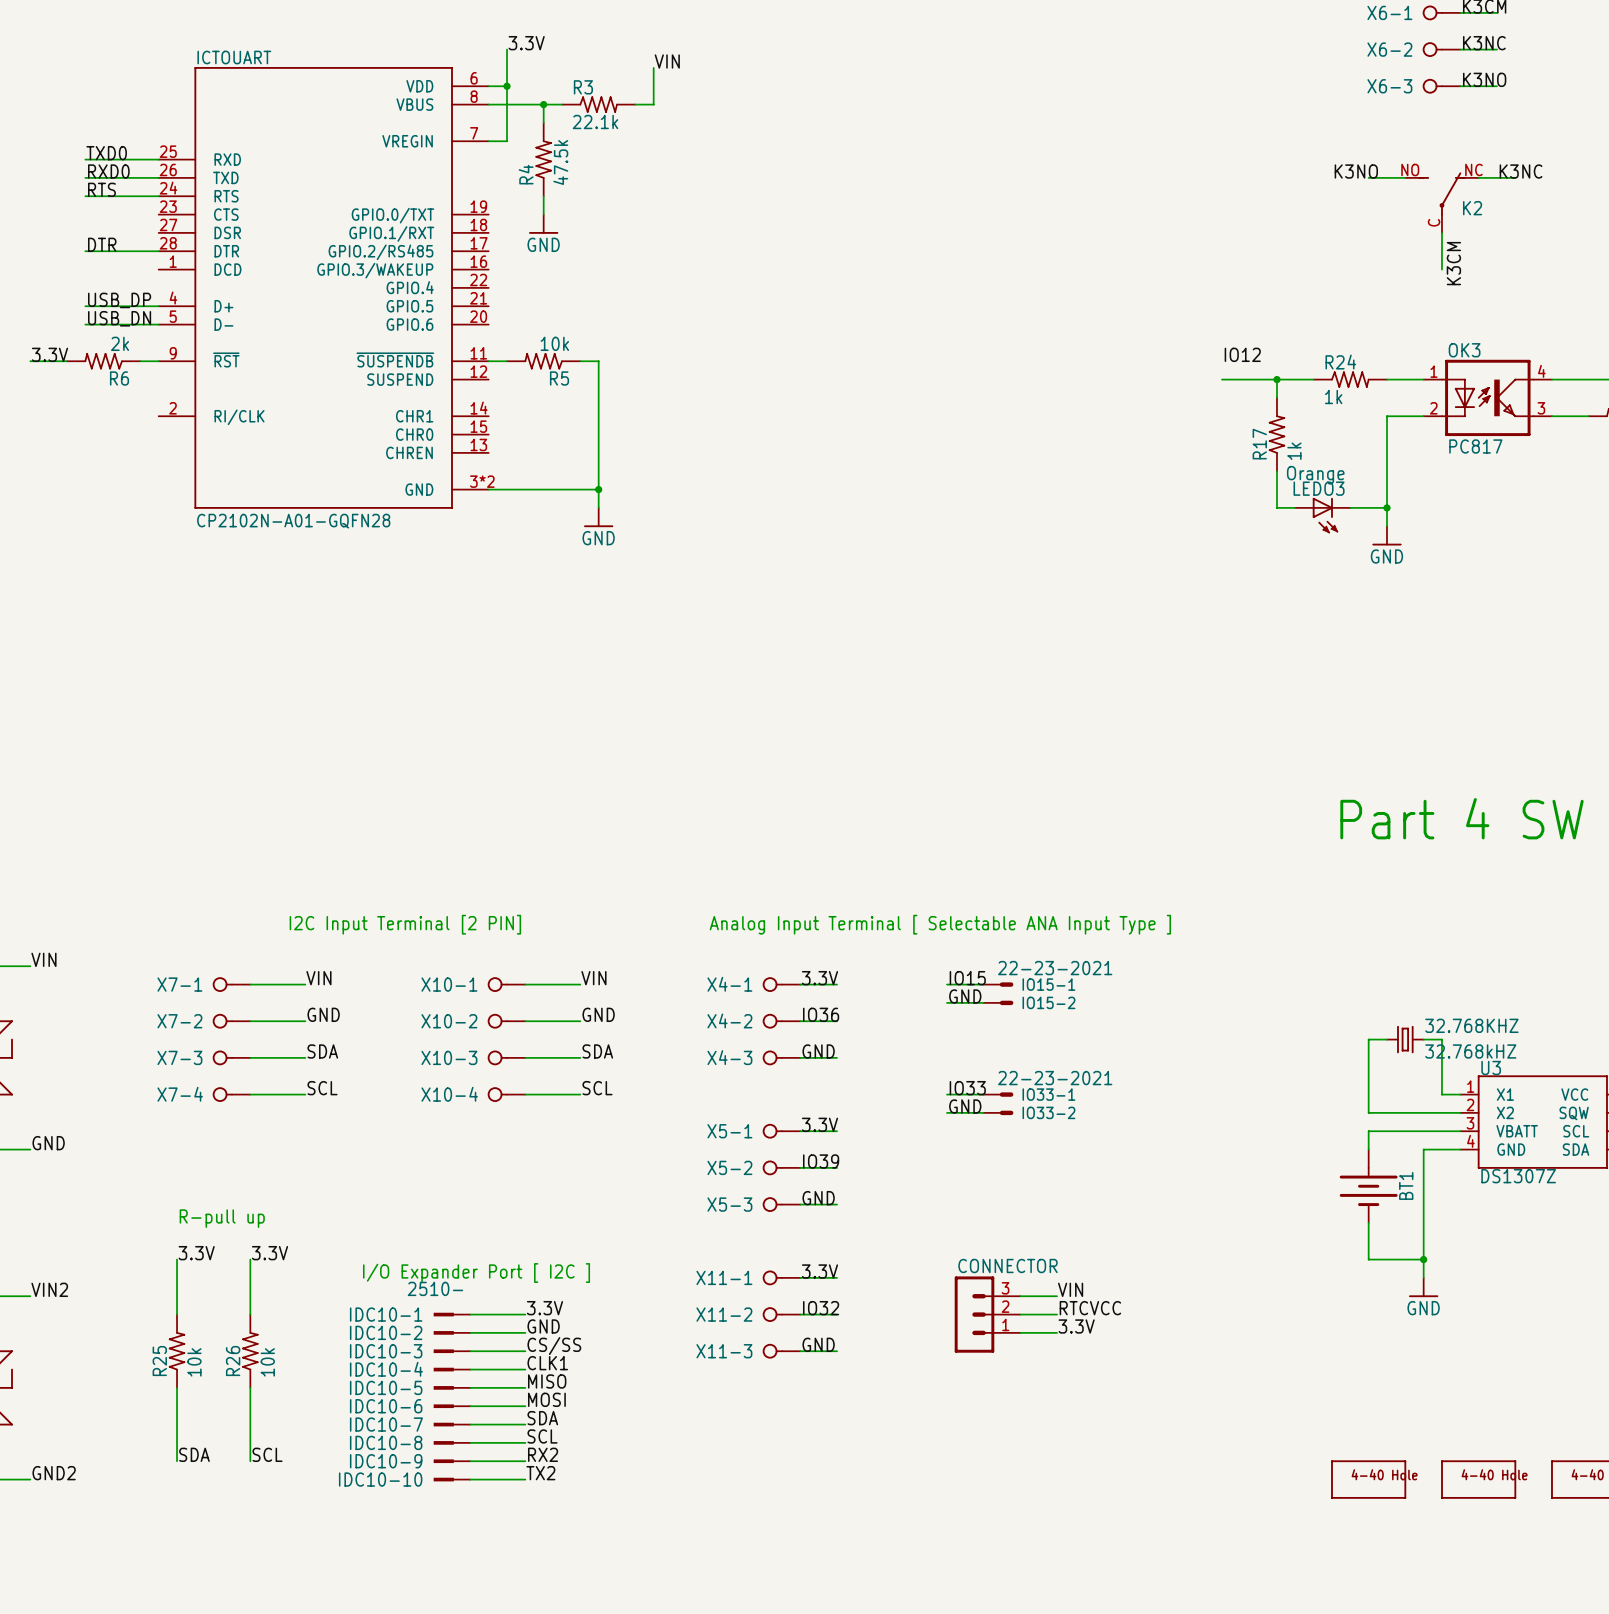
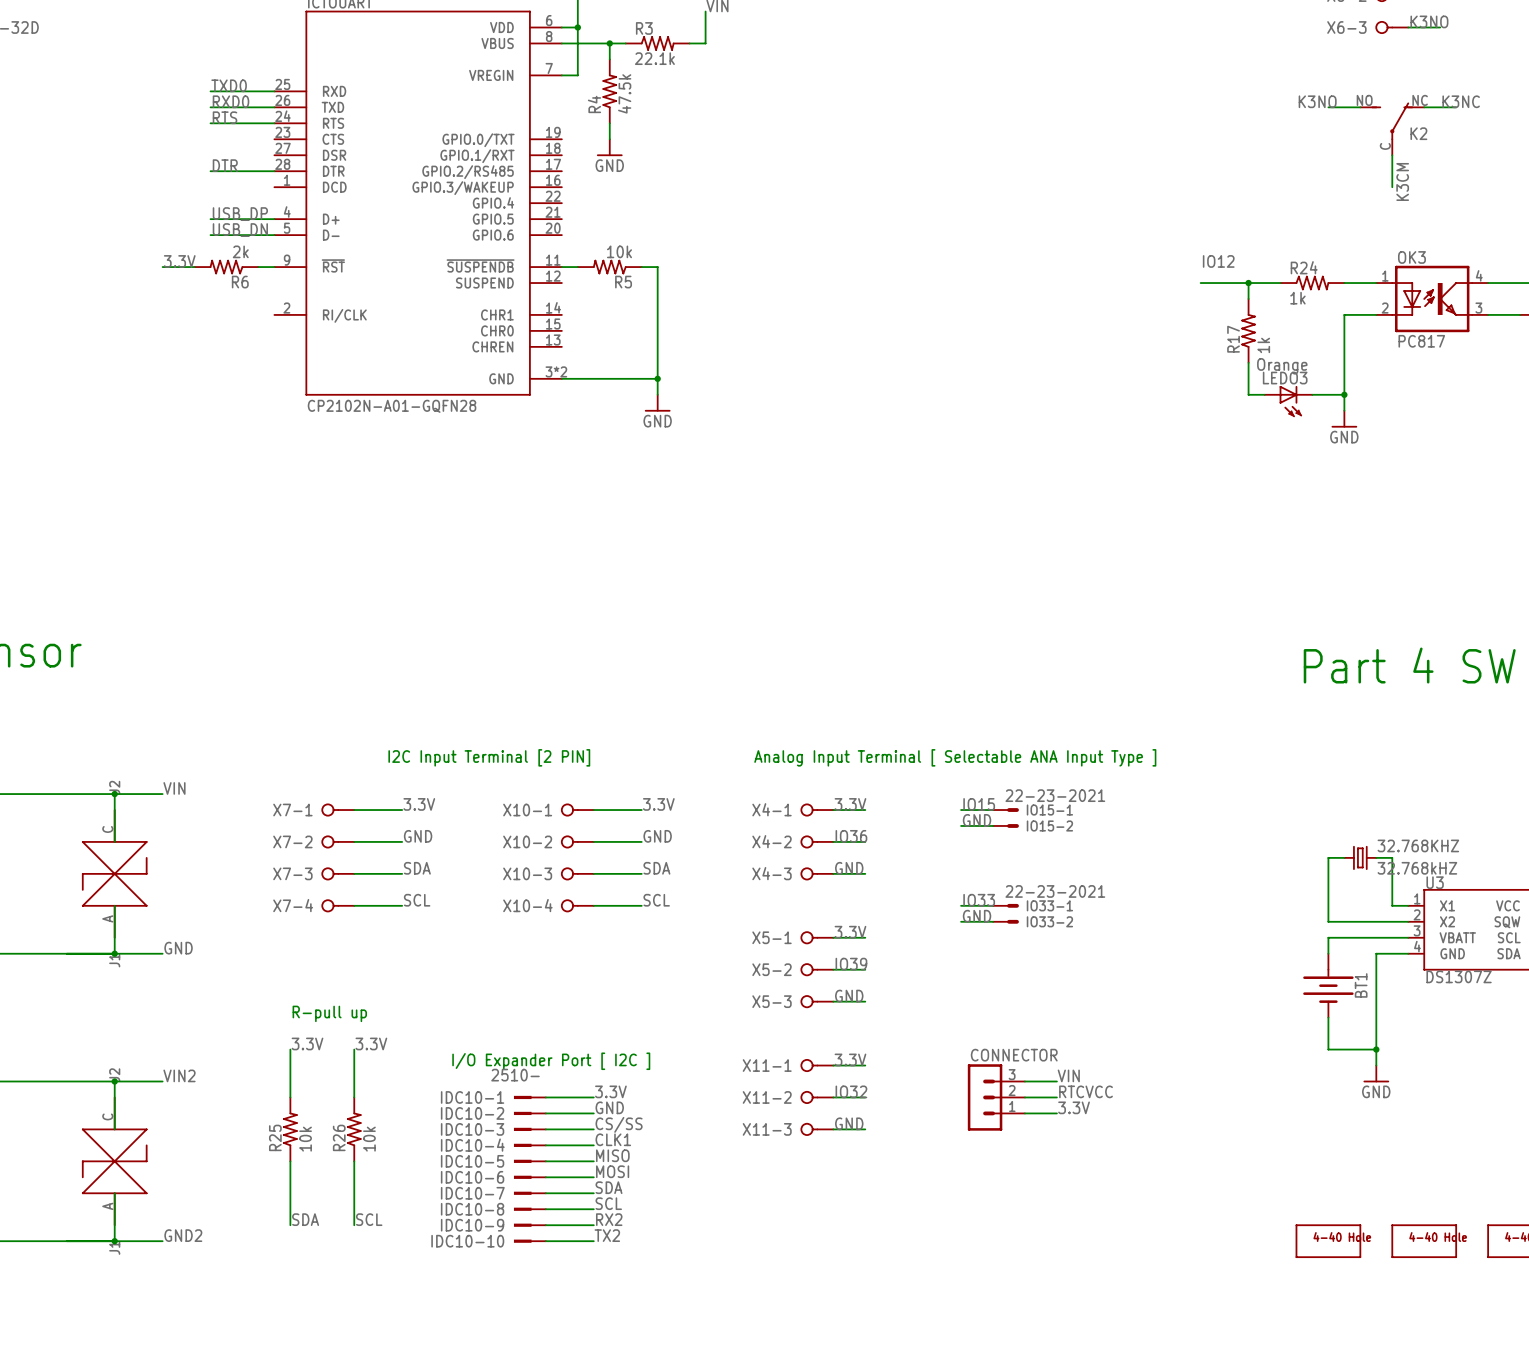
label: VIN (318, 978) -> 3.3V (419, 804)
label: VIN (593, 978) -> 3.3V (658, 804)

